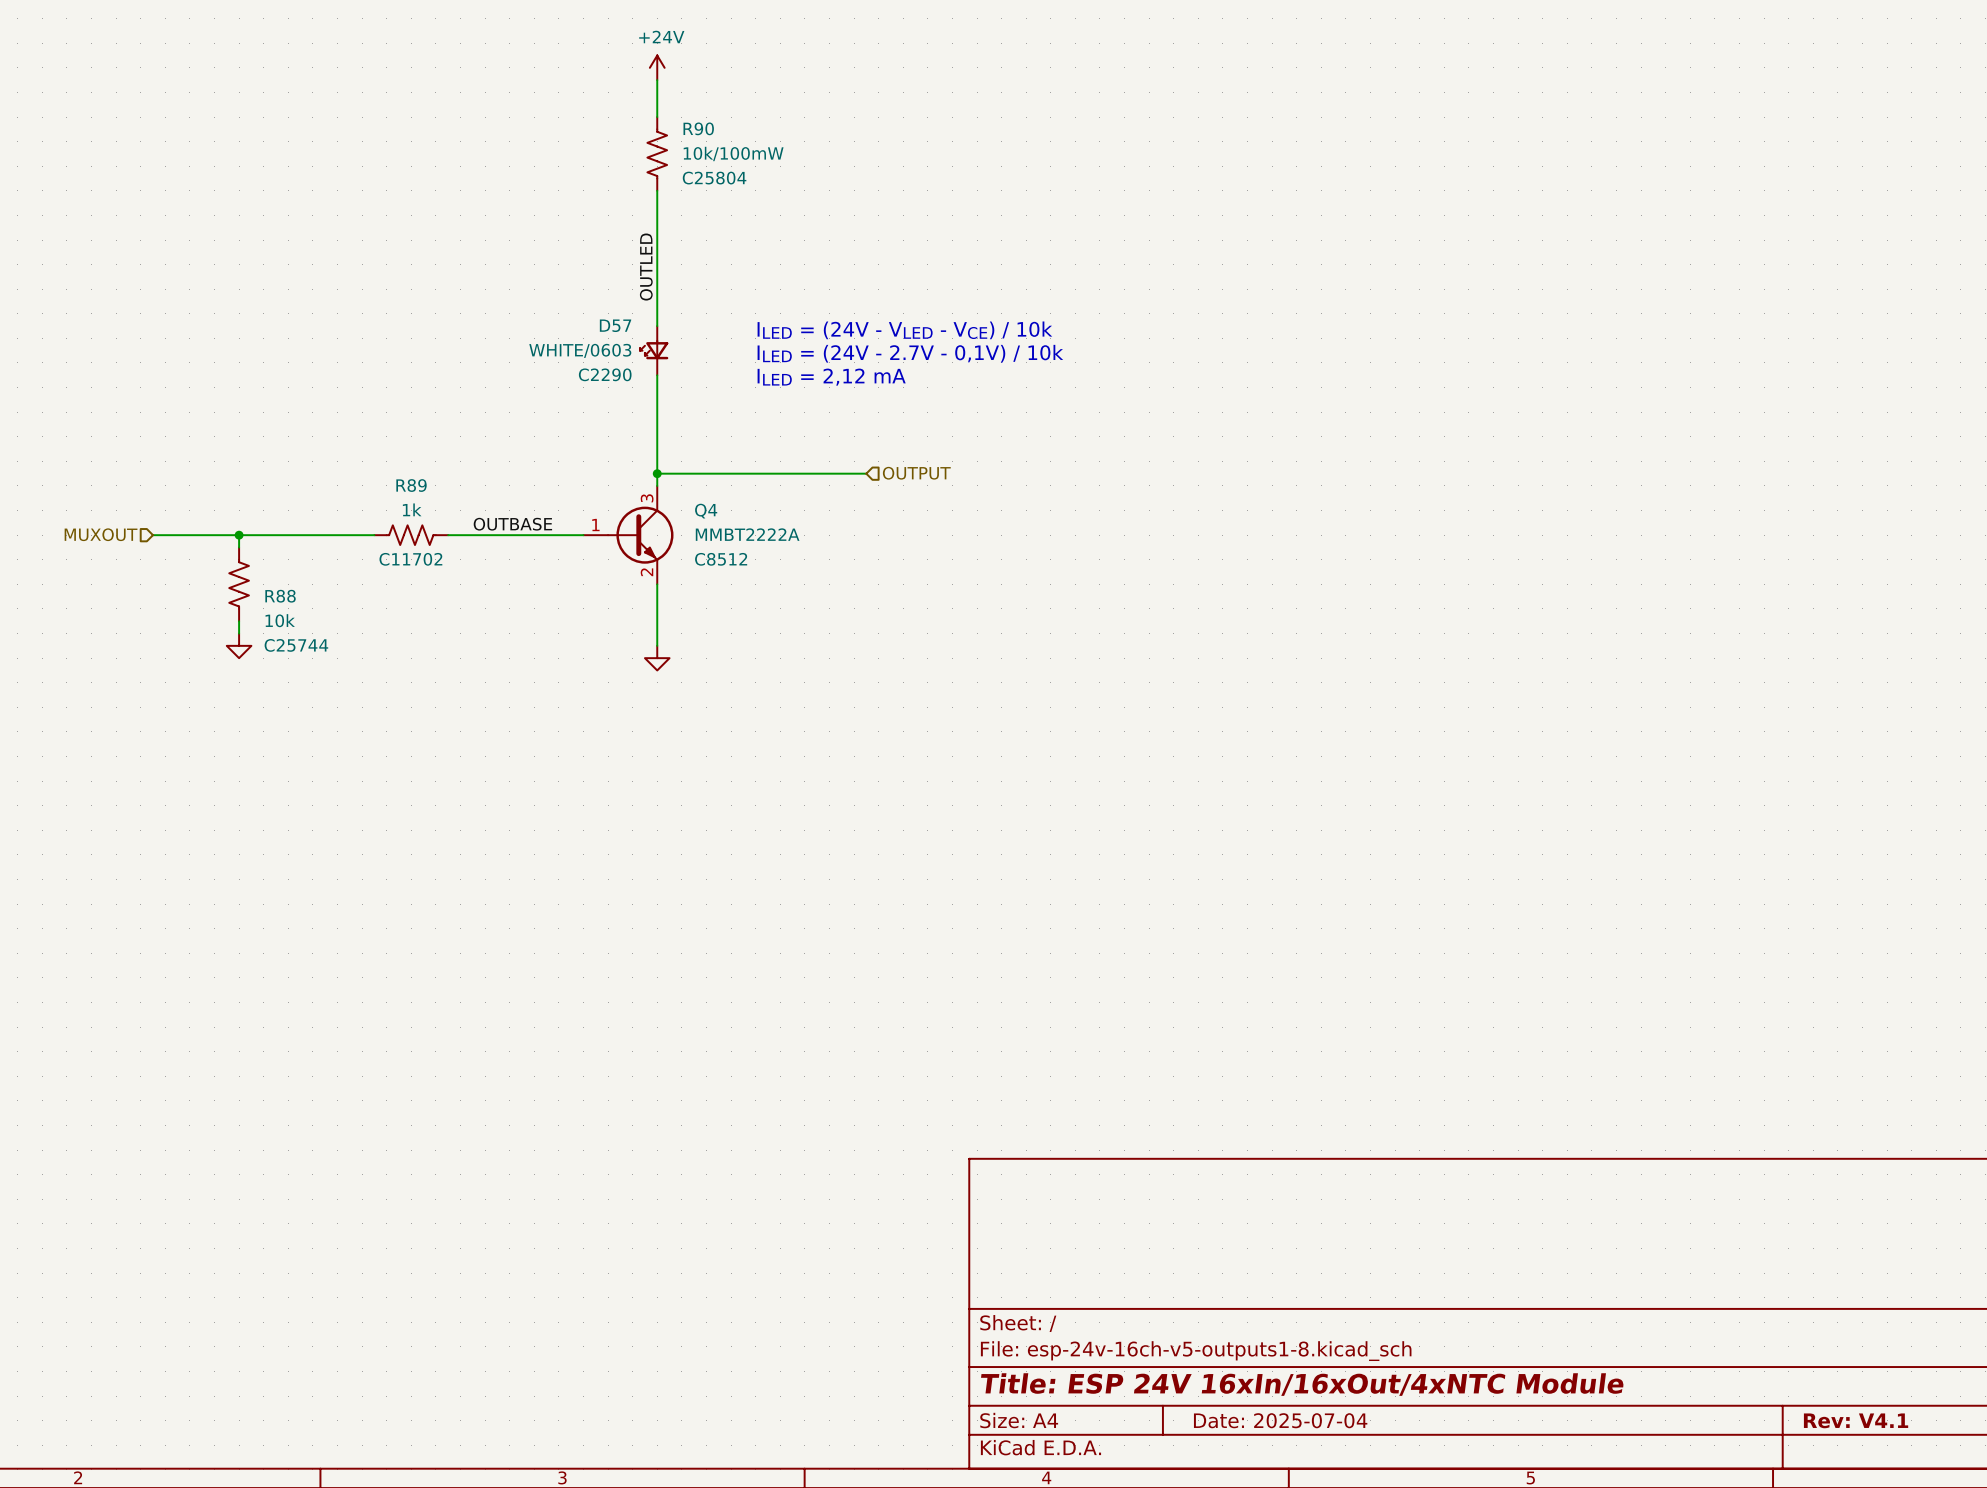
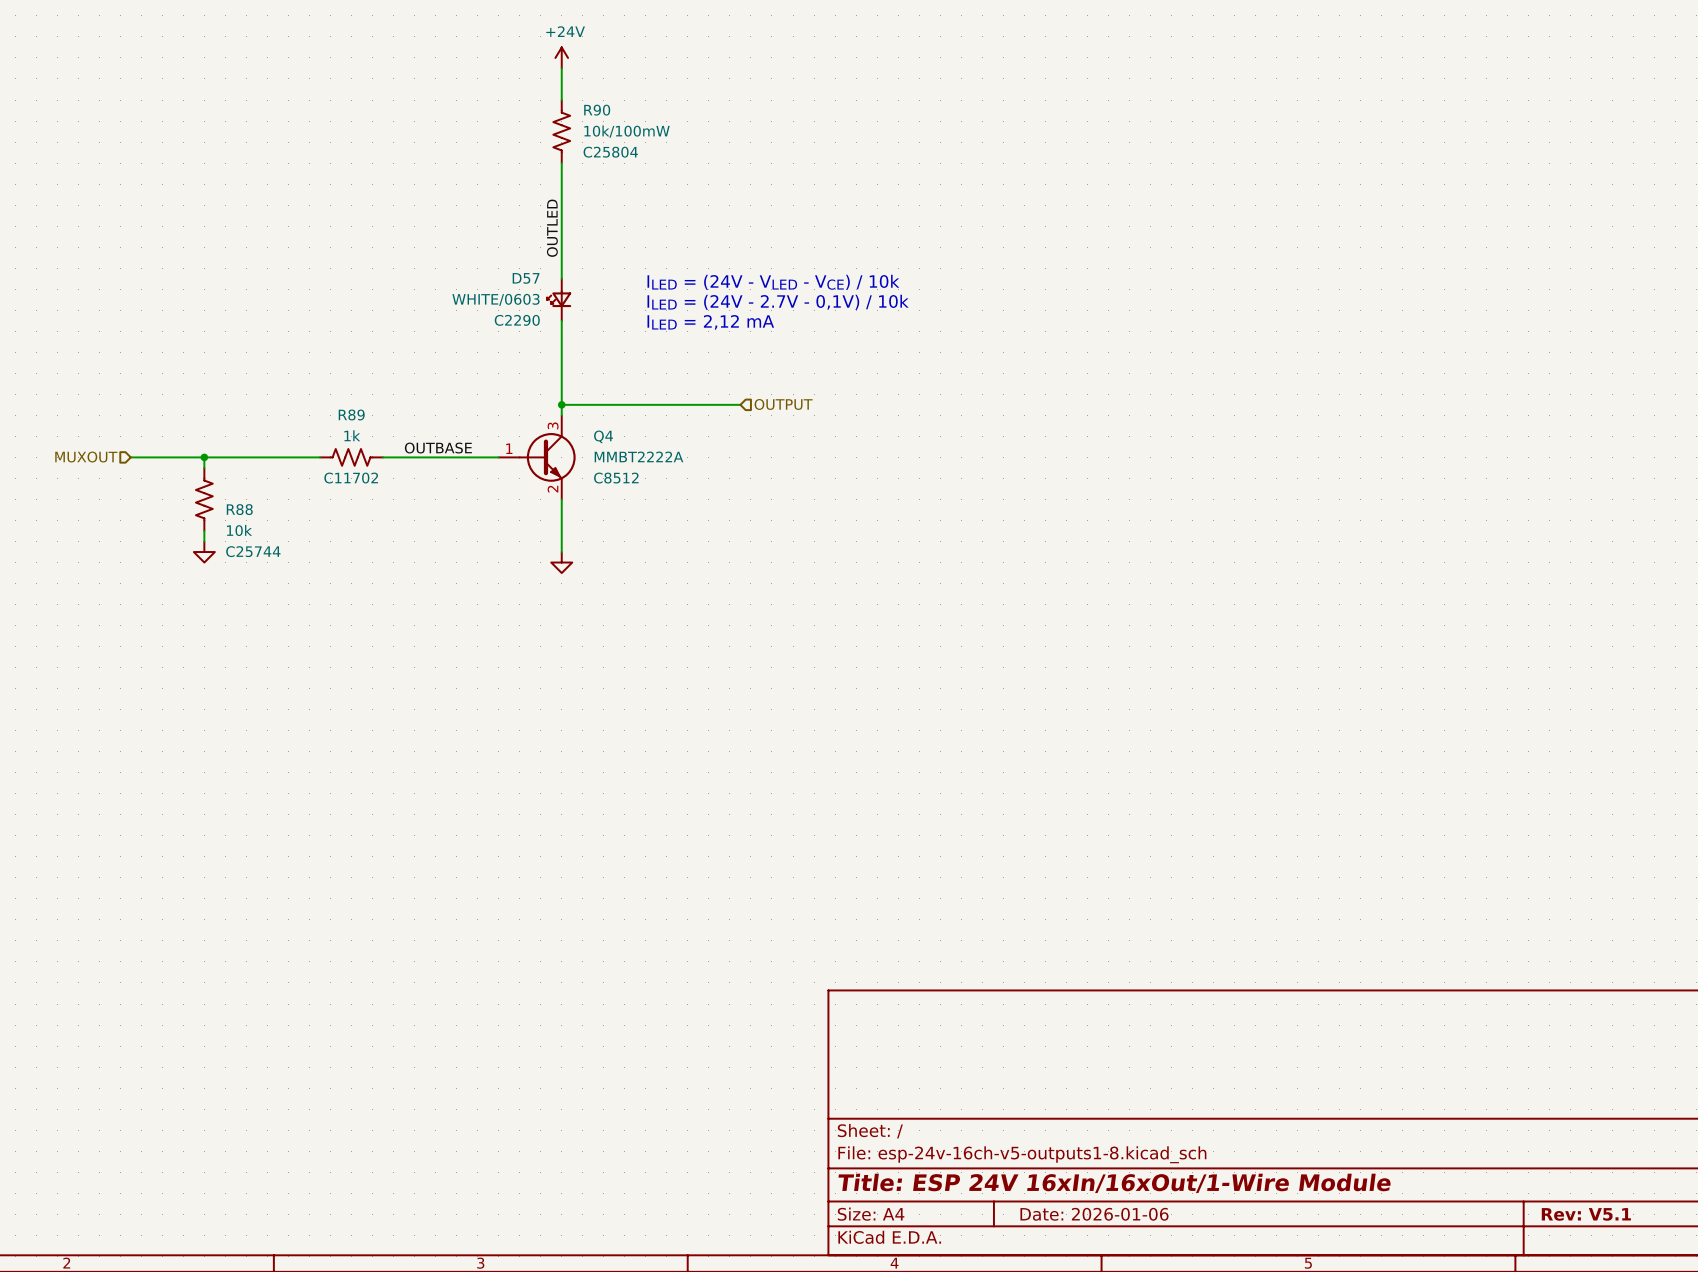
title block: Title: ESP 24V 16xIn/16xOut/4xNTC Module (1302, 1384) -> Title: ESP 24V 16xIn/16xOut/1-Wire Module (1114, 1183)
title block: Date: 2025-07-04 (1280, 1420) -> Date: 2026-01-06 (1094, 1214)
title block: Rev: V4.1 (1856, 1420) -> Rev: V5.1 (1586, 1214)

